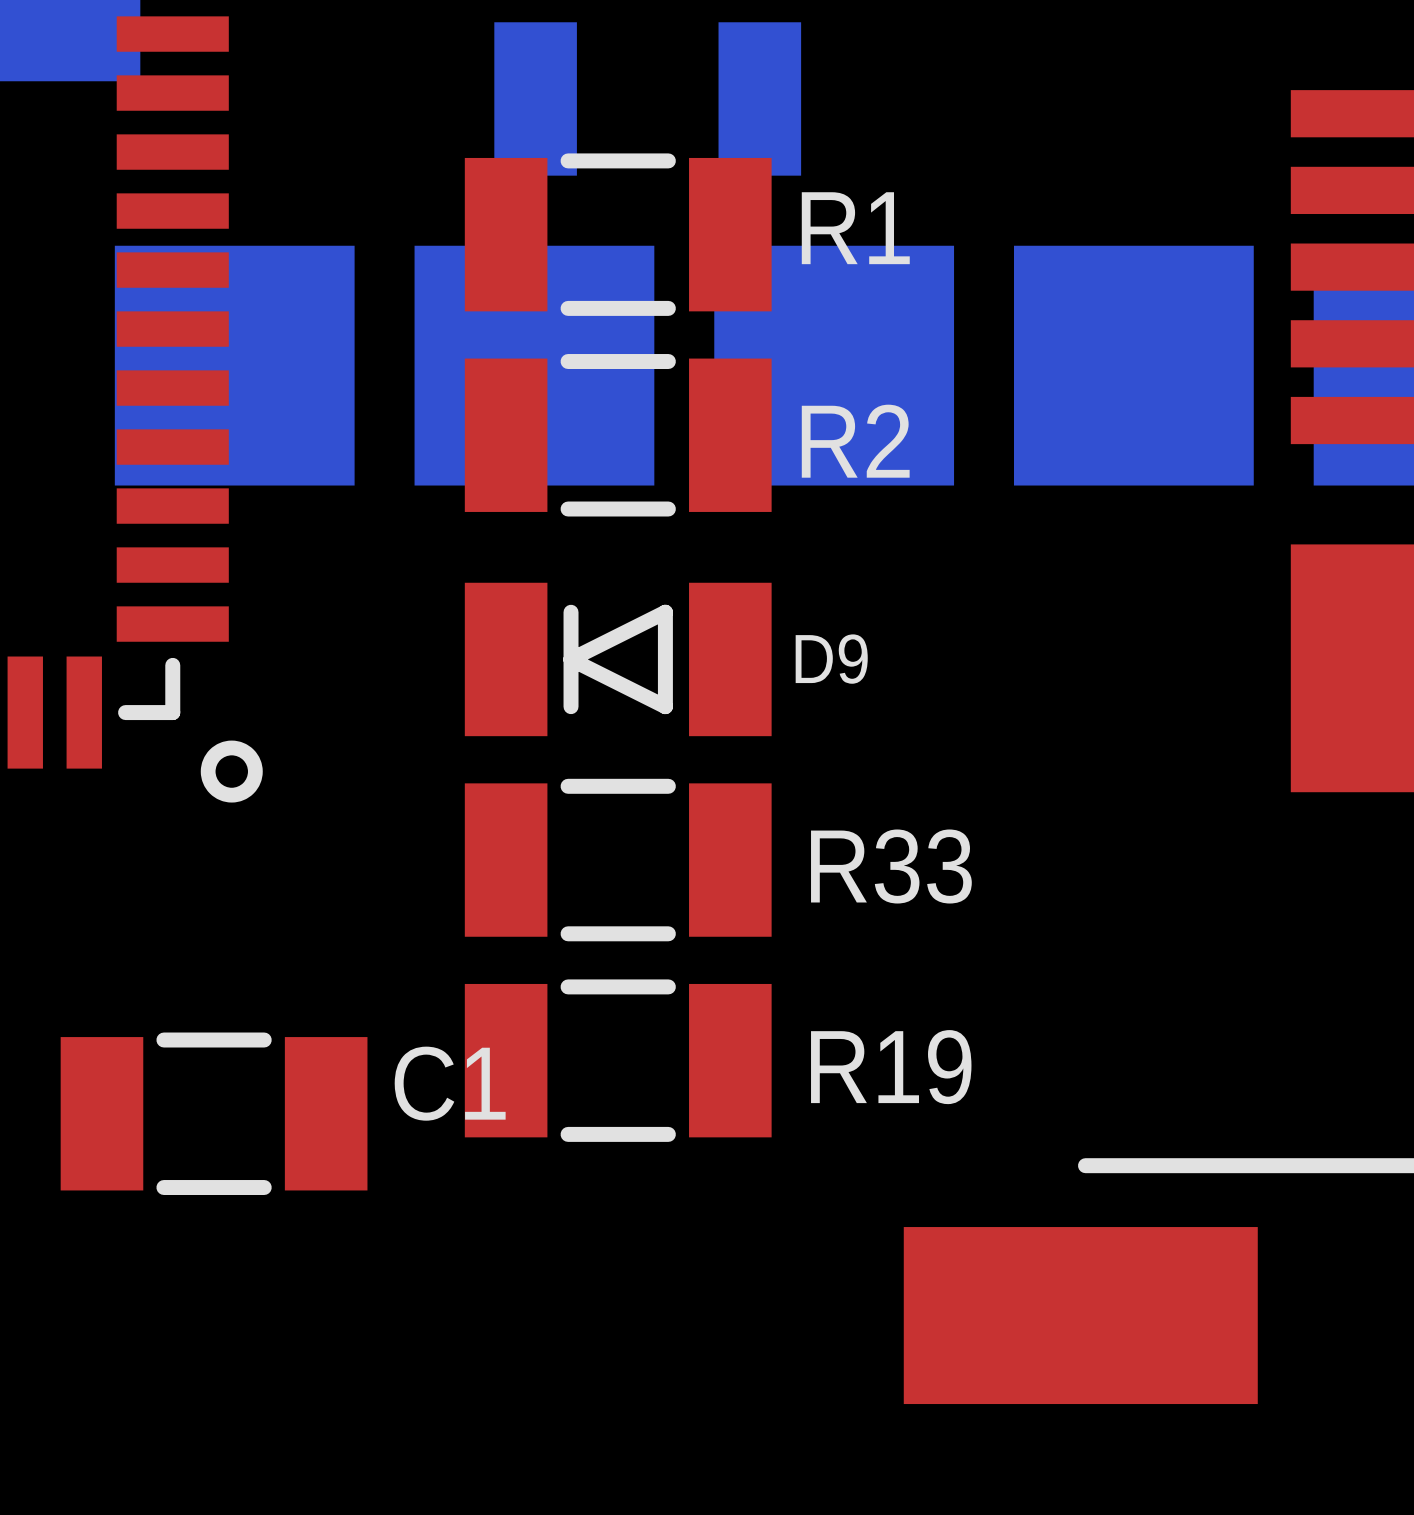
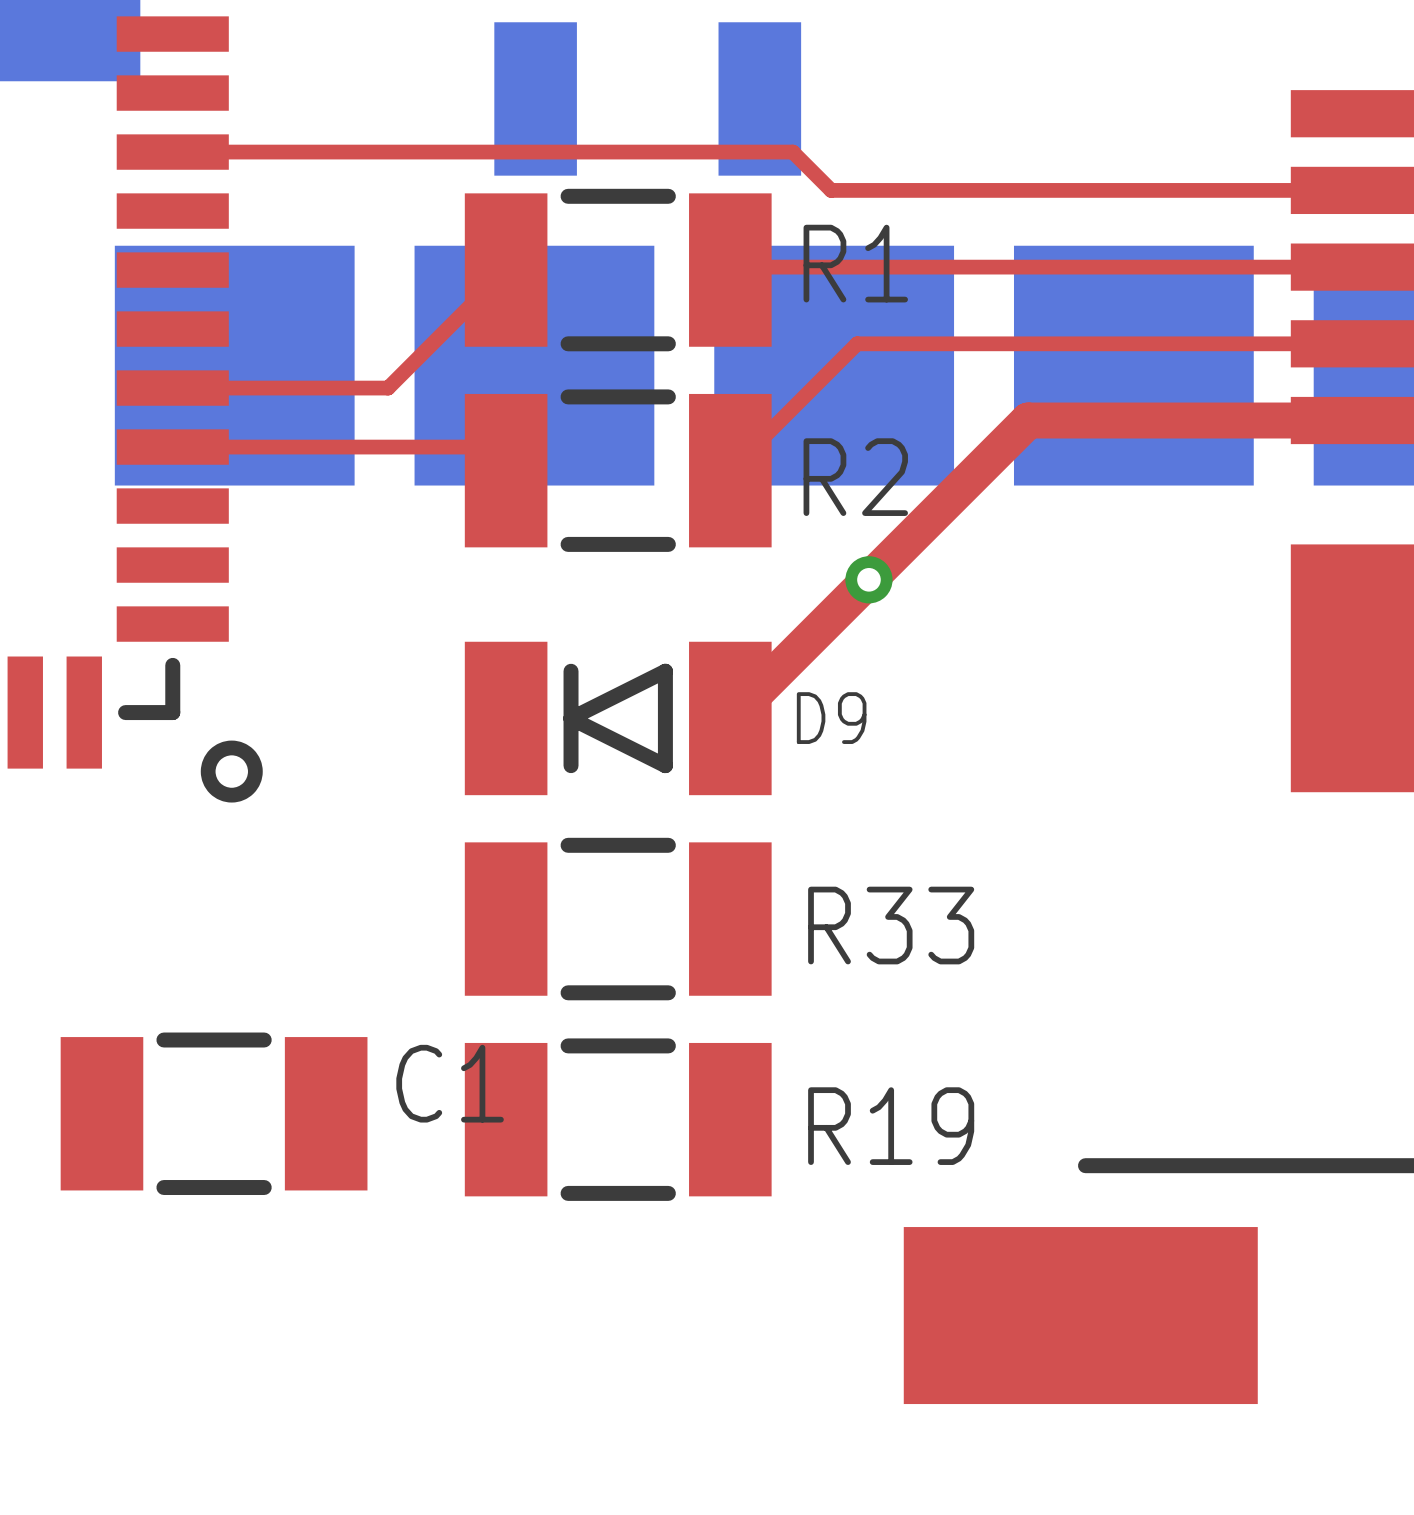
top track: none -> (172, 152) (792, 152) (831, 190) (1370, 190)
R1 position: (618, 234) -> (618, 270)
top track: none -> (1370, 267) (733, 267) (730, 270)
top track: none -> (506, 270) (388, 388) (172, 388)
top track: none -> (1370, 343) (857, 343) (730, 470)
top track: none -> (1370, 420) (1028, 420) (730, 718)
R2 position: (618, 435) -> (618, 470)
top track: none -> (172, 447) (482, 447) (506, 470)
via: none -> (868, 579)
D9 position: (618, 659) -> (618, 718)
R33 position: (618, 860) -> (618, 919)
R19 position: (618, 1060) -> (618, 1119)

